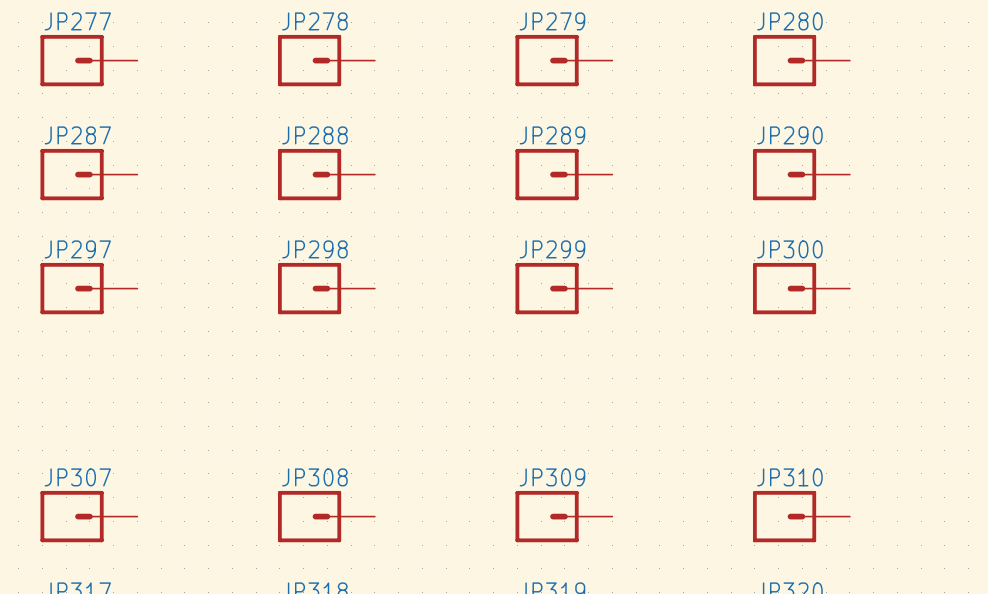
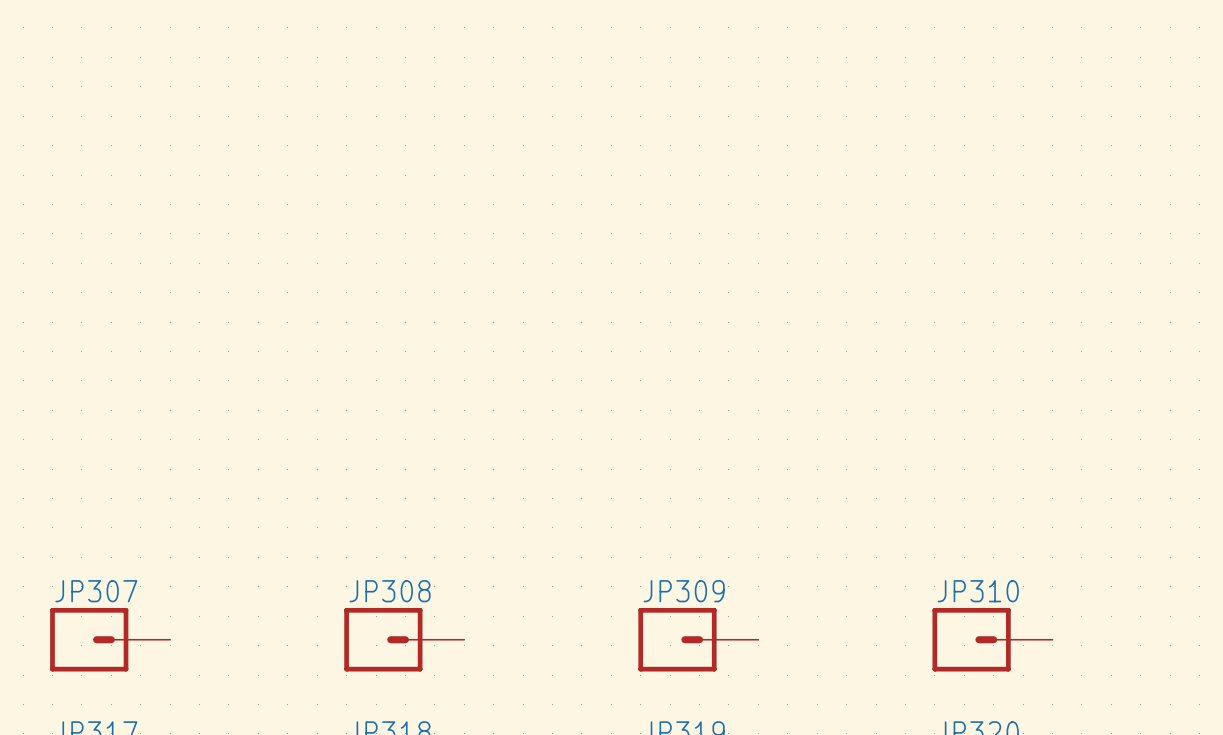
JP277: (88, 60) -> none
JP278: (326, 60) -> none
JP279: (563, 60) -> none
JP280: (801, 60) -> none
JP287: (88, 174) -> none
JP288: (326, 174) -> none
JP289: (563, 174) -> none
JP290: (801, 174) -> none
JP297: (88, 288) -> none
JP298: (326, 288) -> none
JP299: (563, 288) -> none
JP300: (801, 288) -> none

